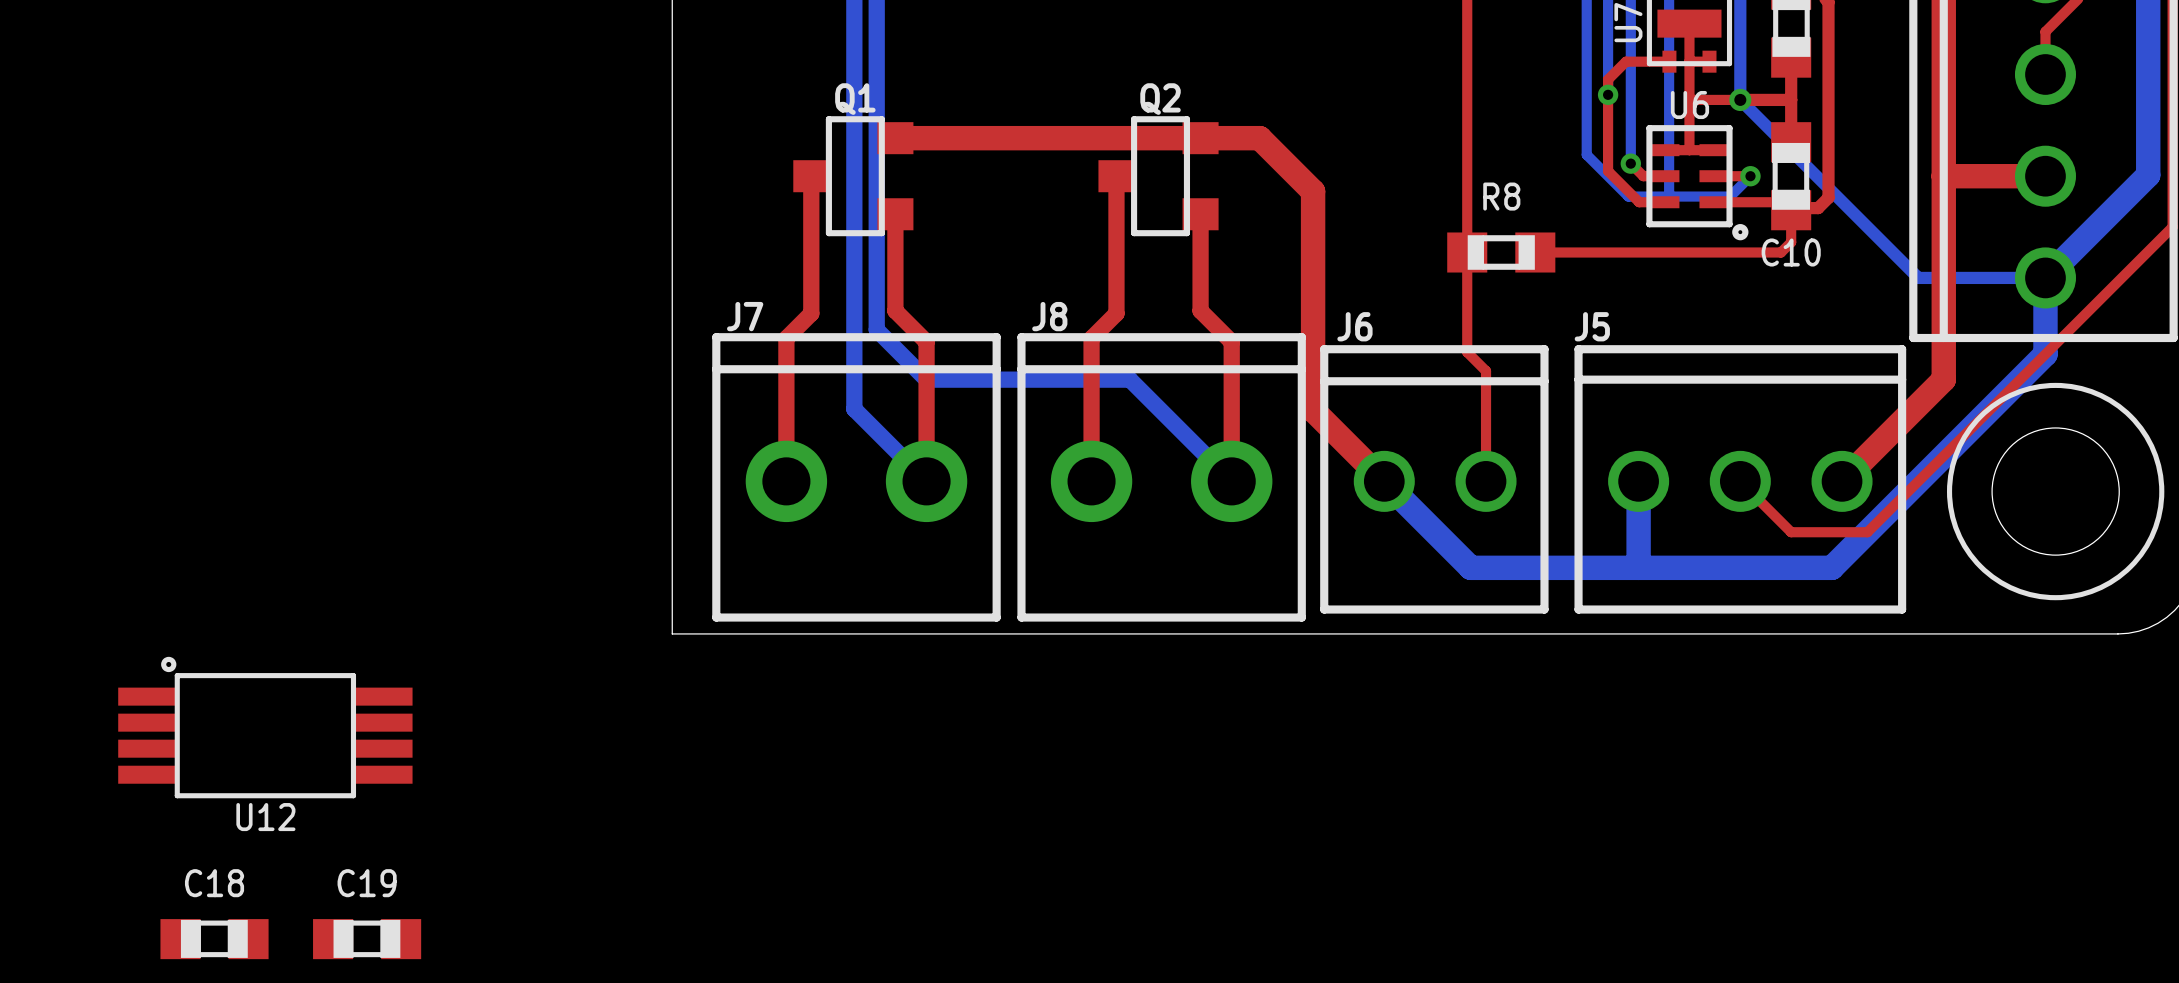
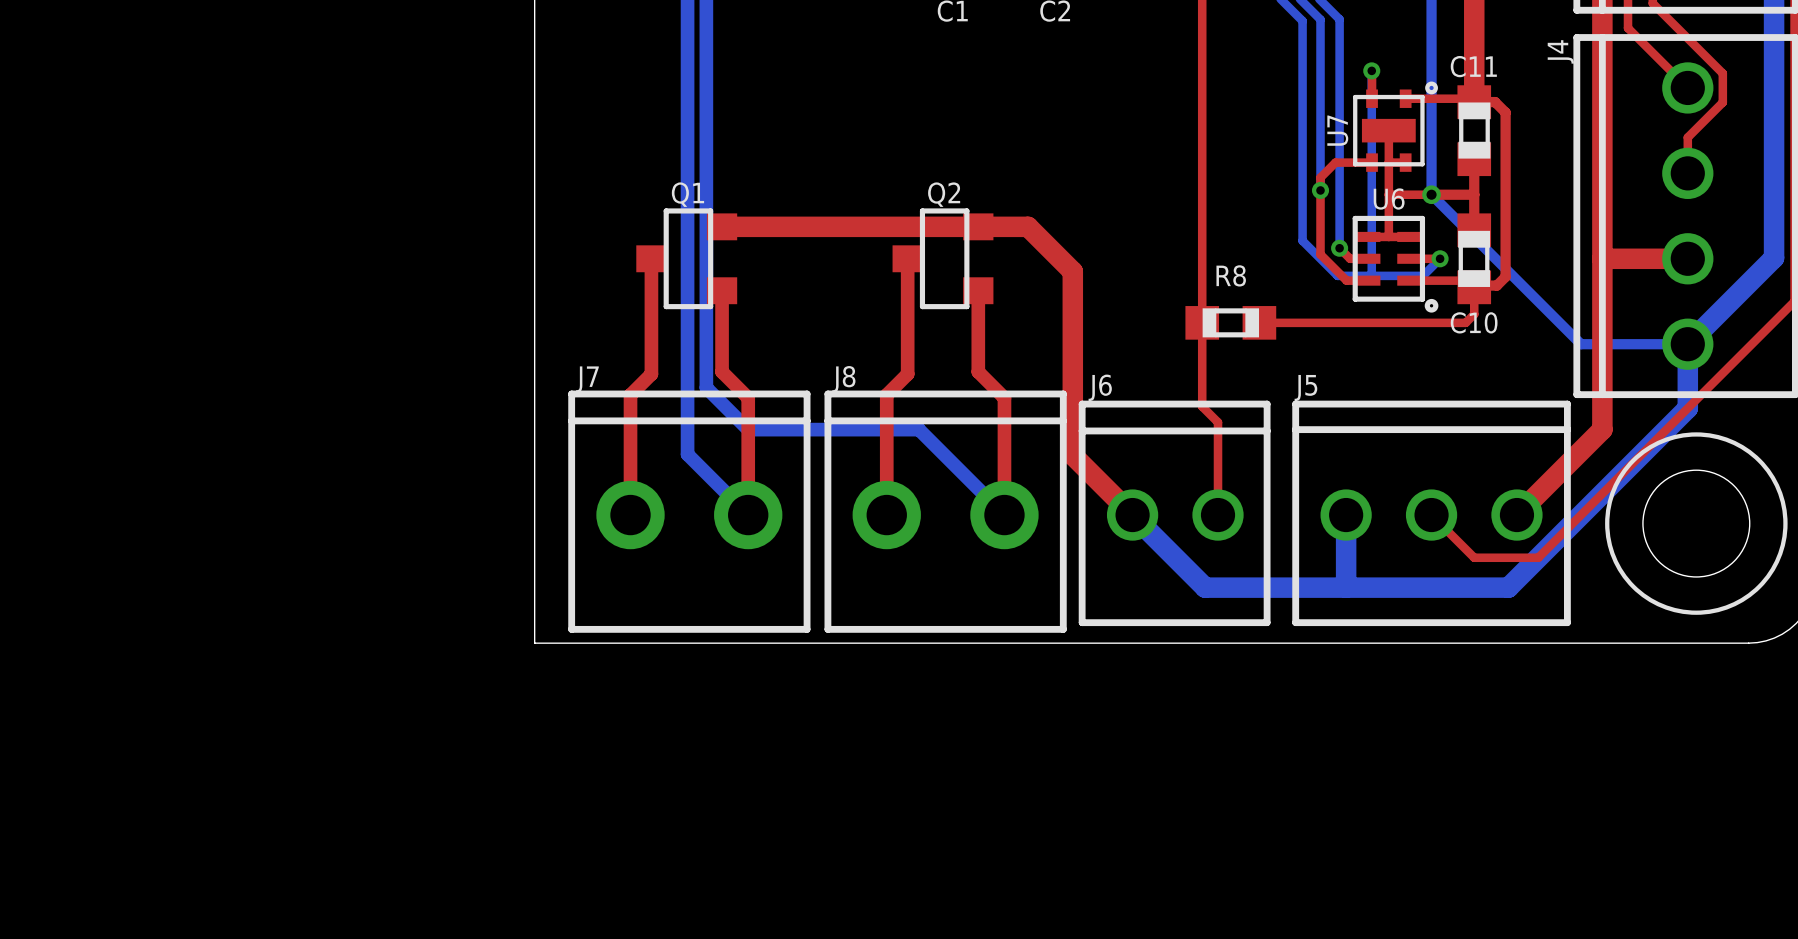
U12: (265, 727) -> none
C18: (214, 939) -> none
C19: (367, 939) -> none

